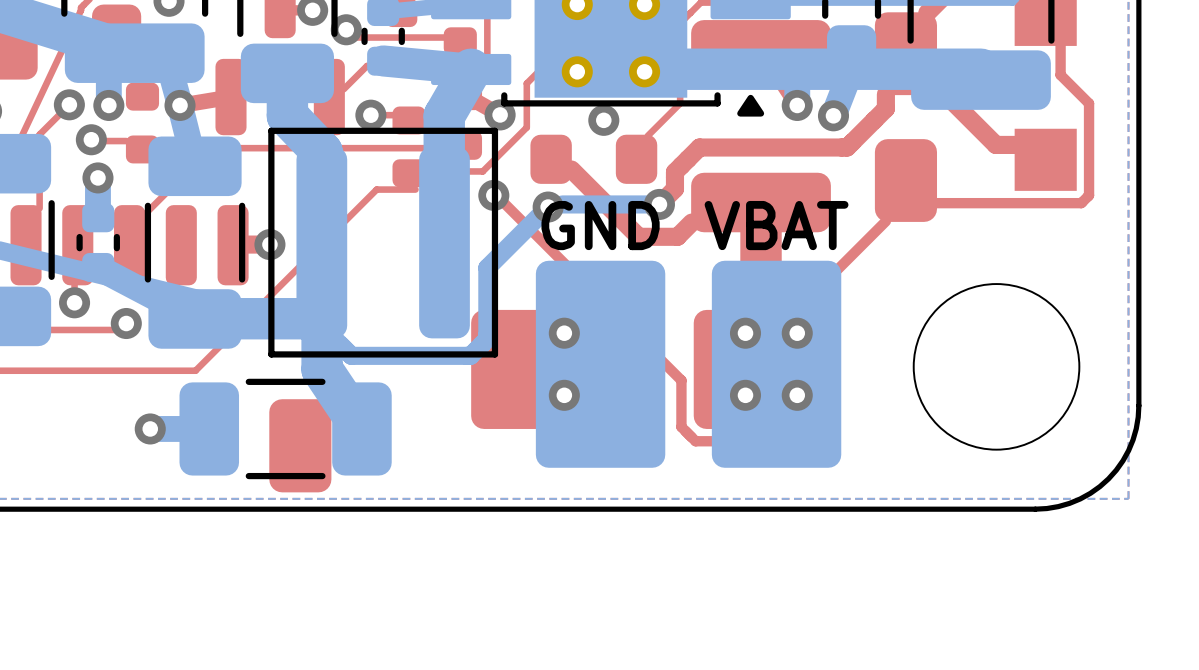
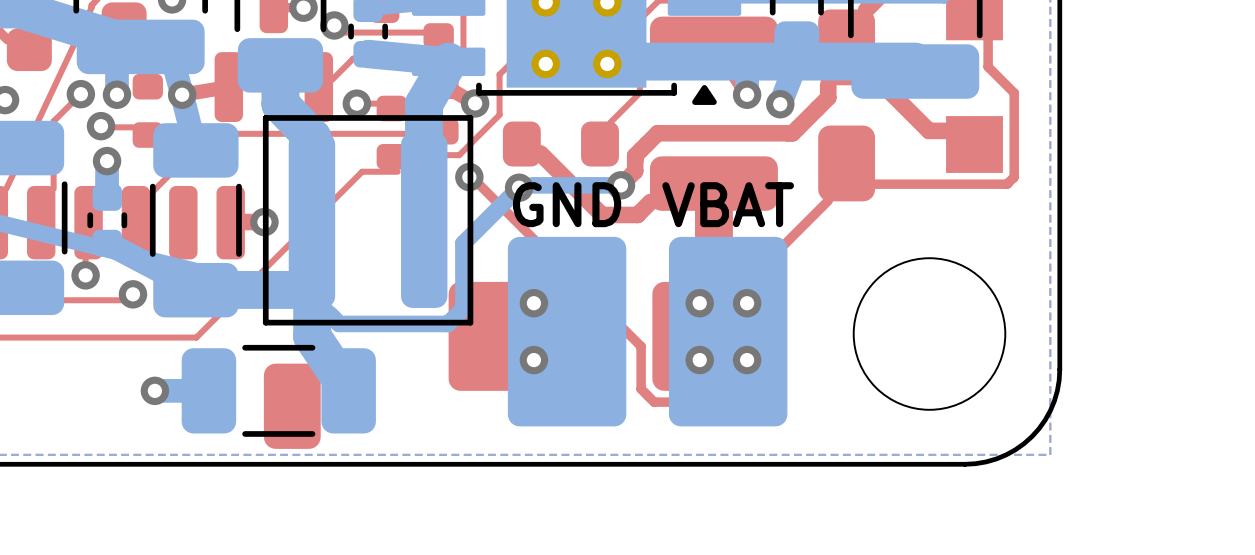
via: (603, 120) -> none

